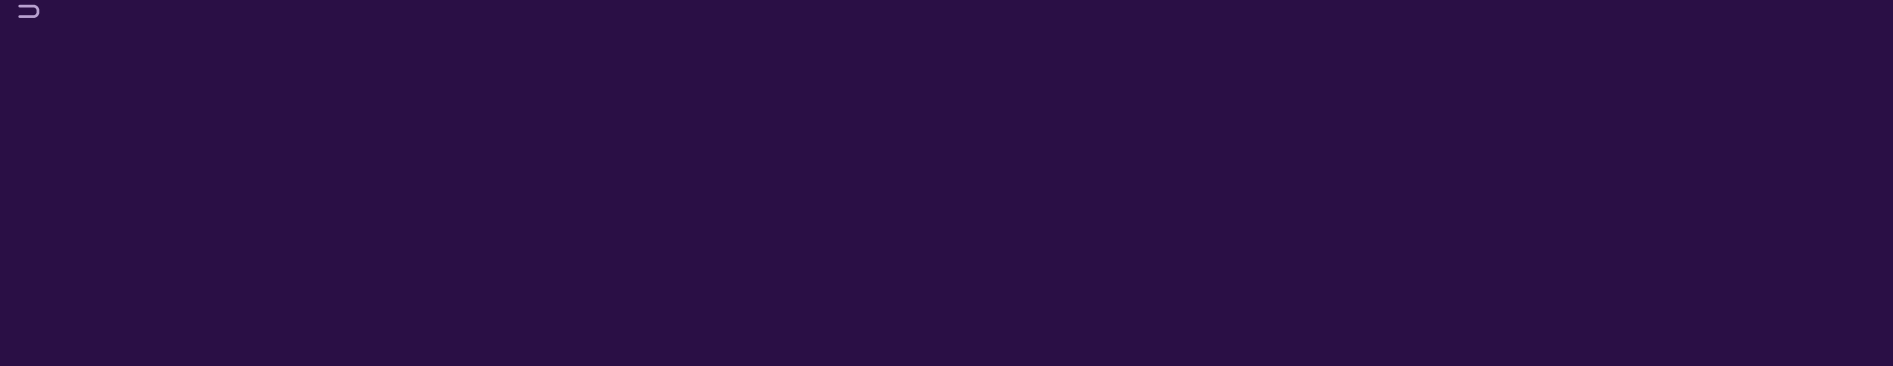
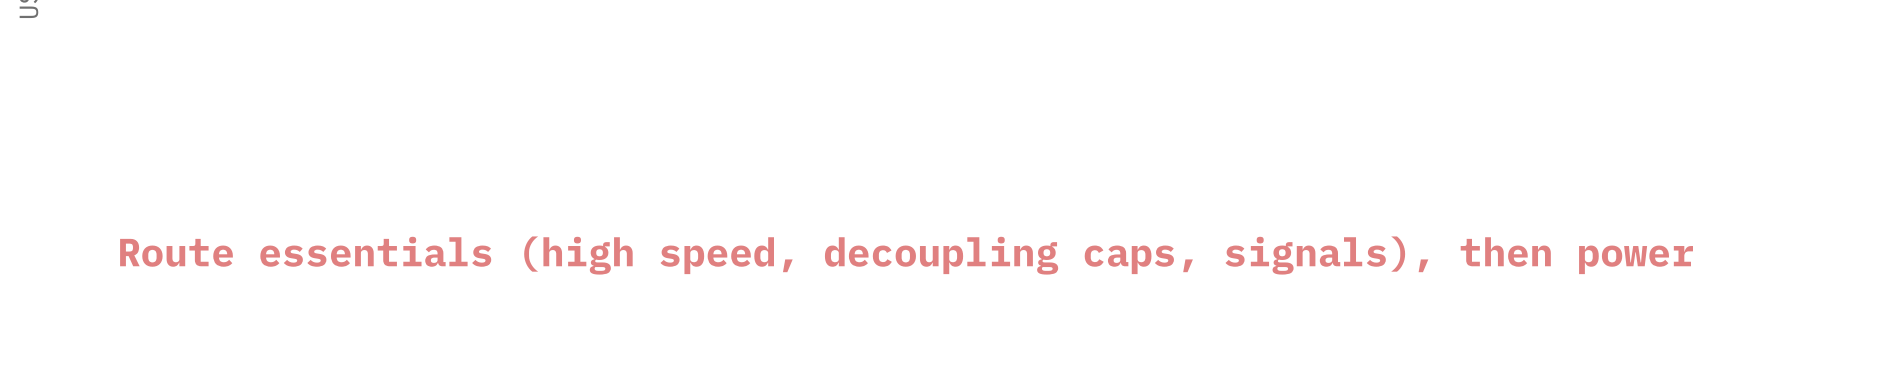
text: none -> Route essentials (high speed, decoupling caps, signals), then power (906, 255)

